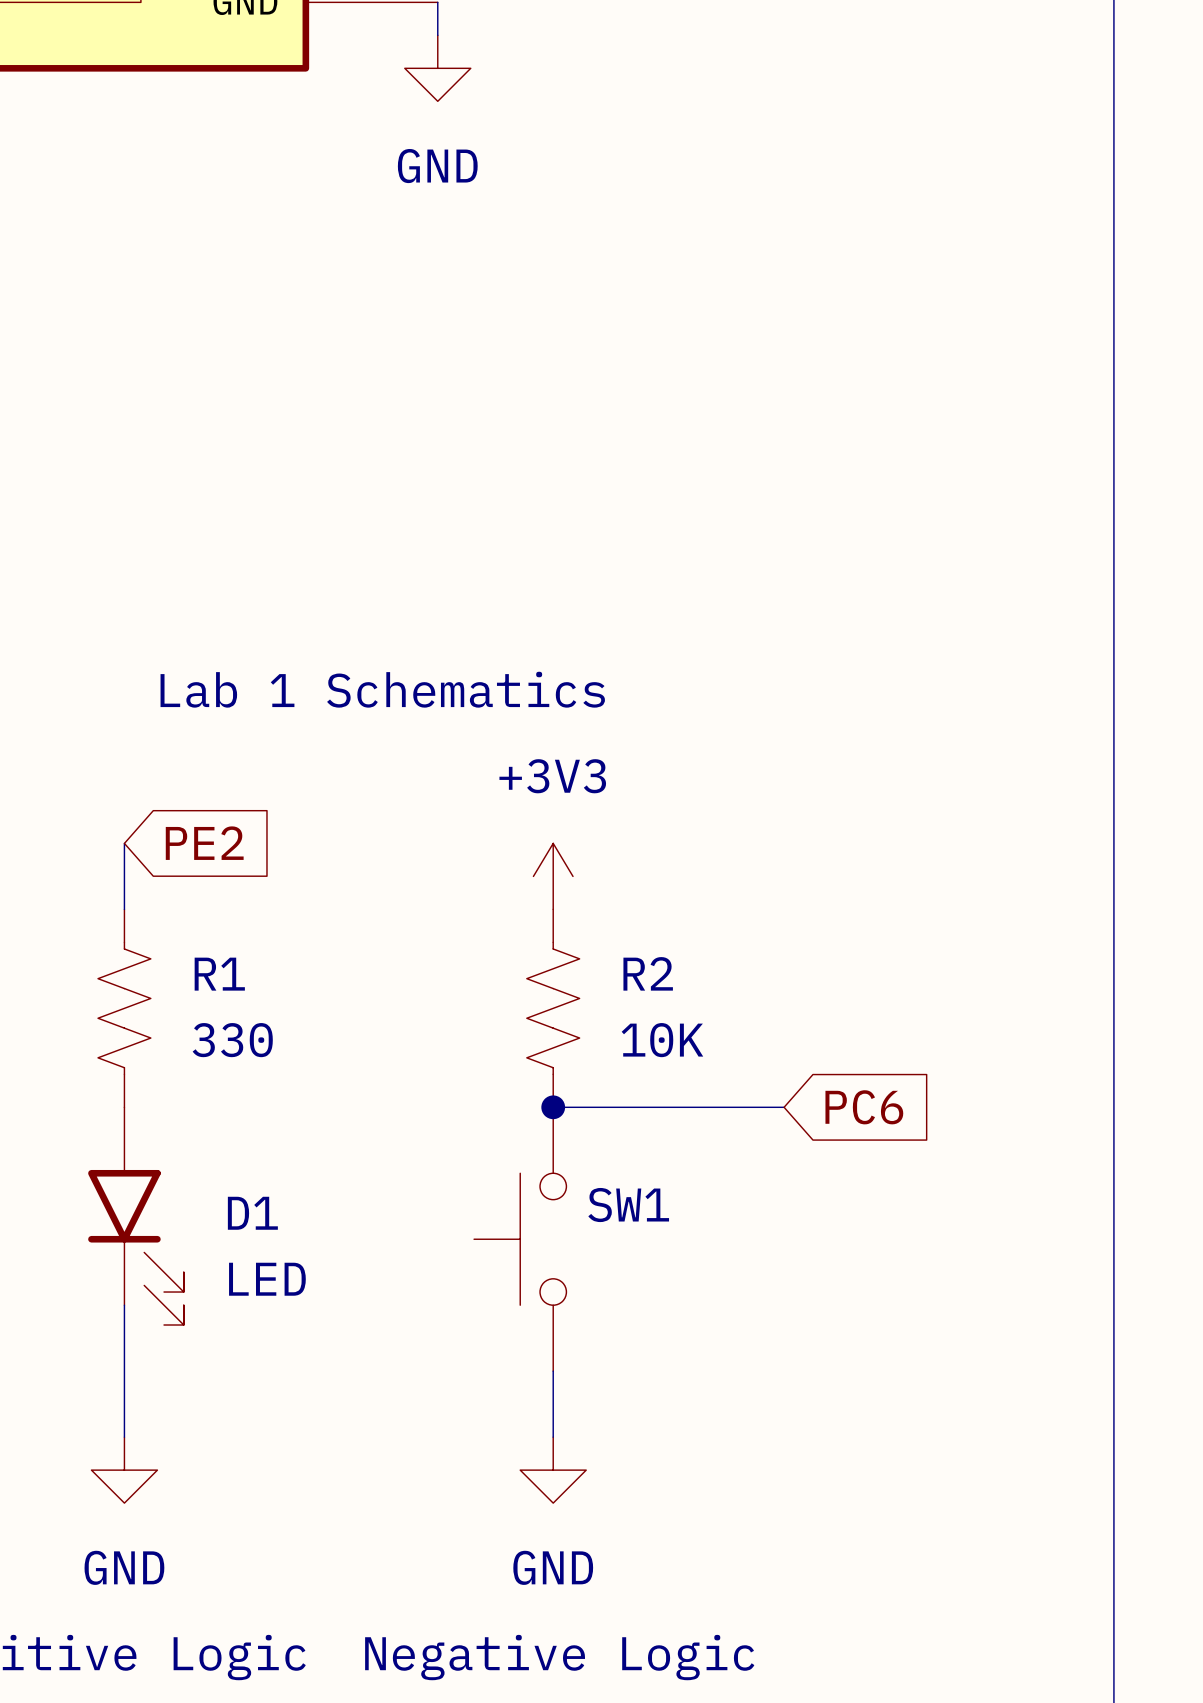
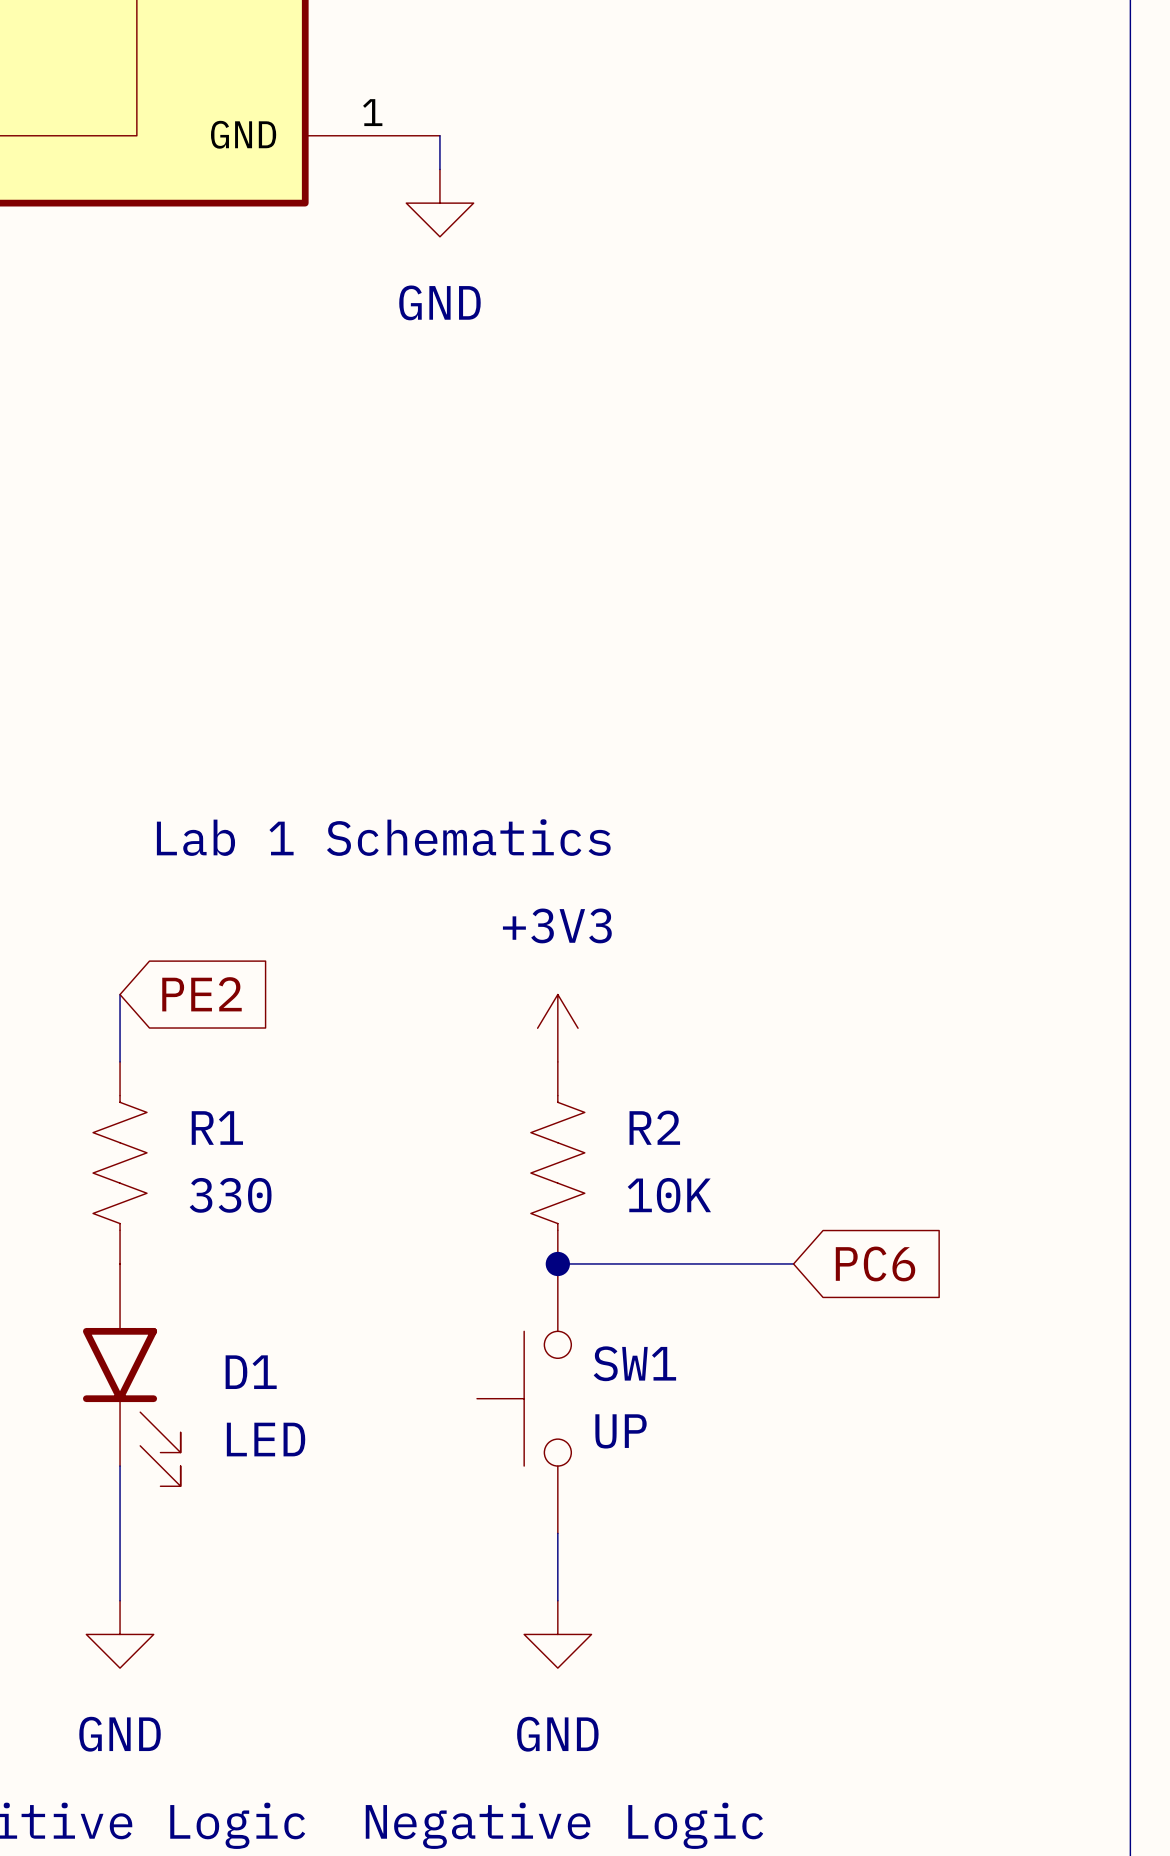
SW1 value: none -> UP (621, 1431)

